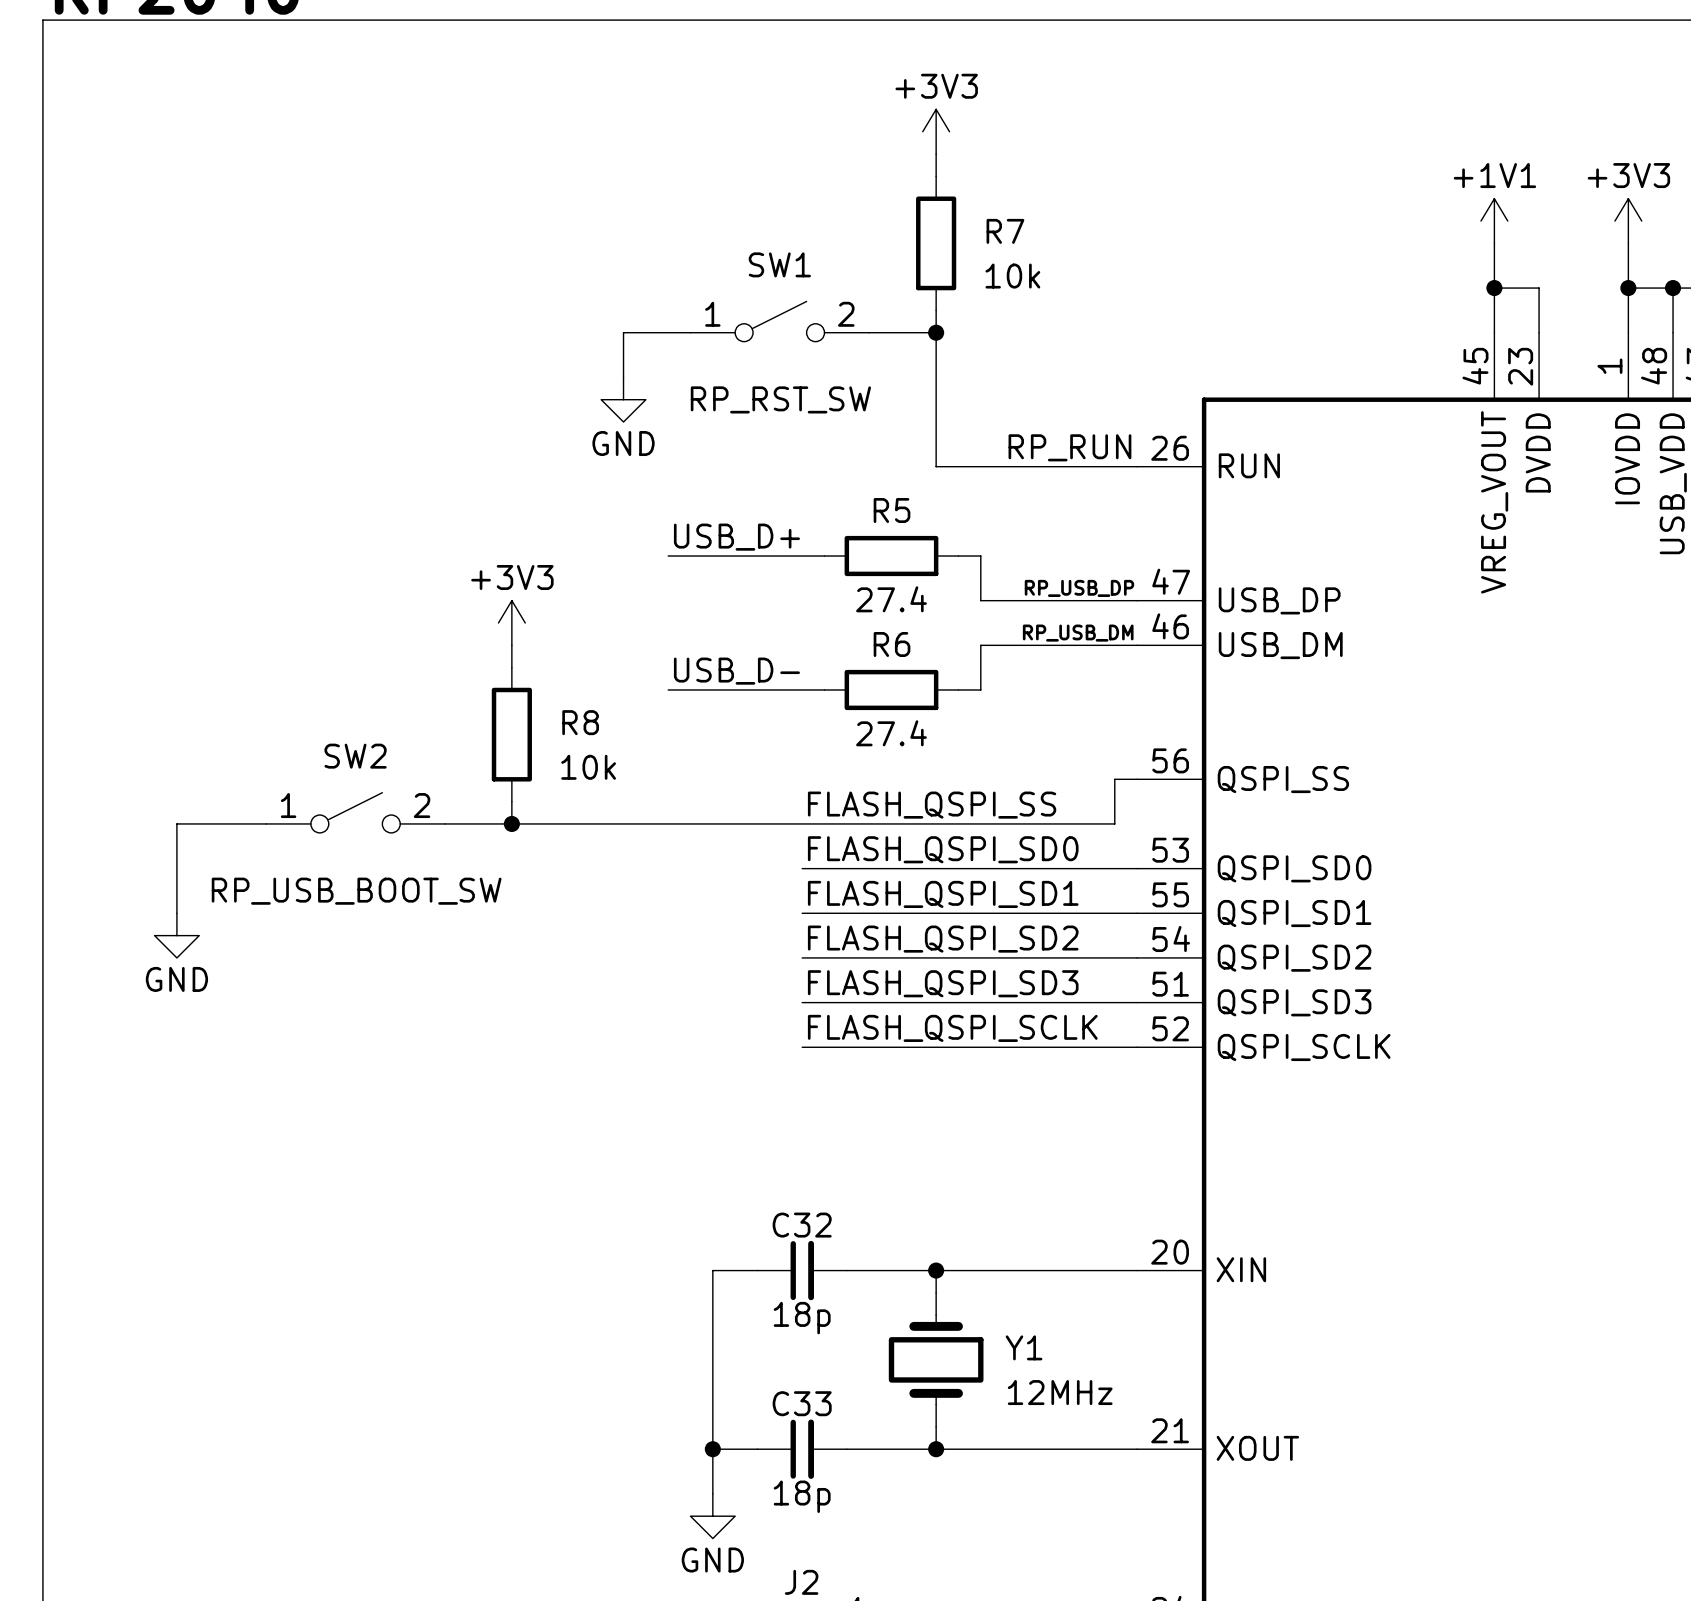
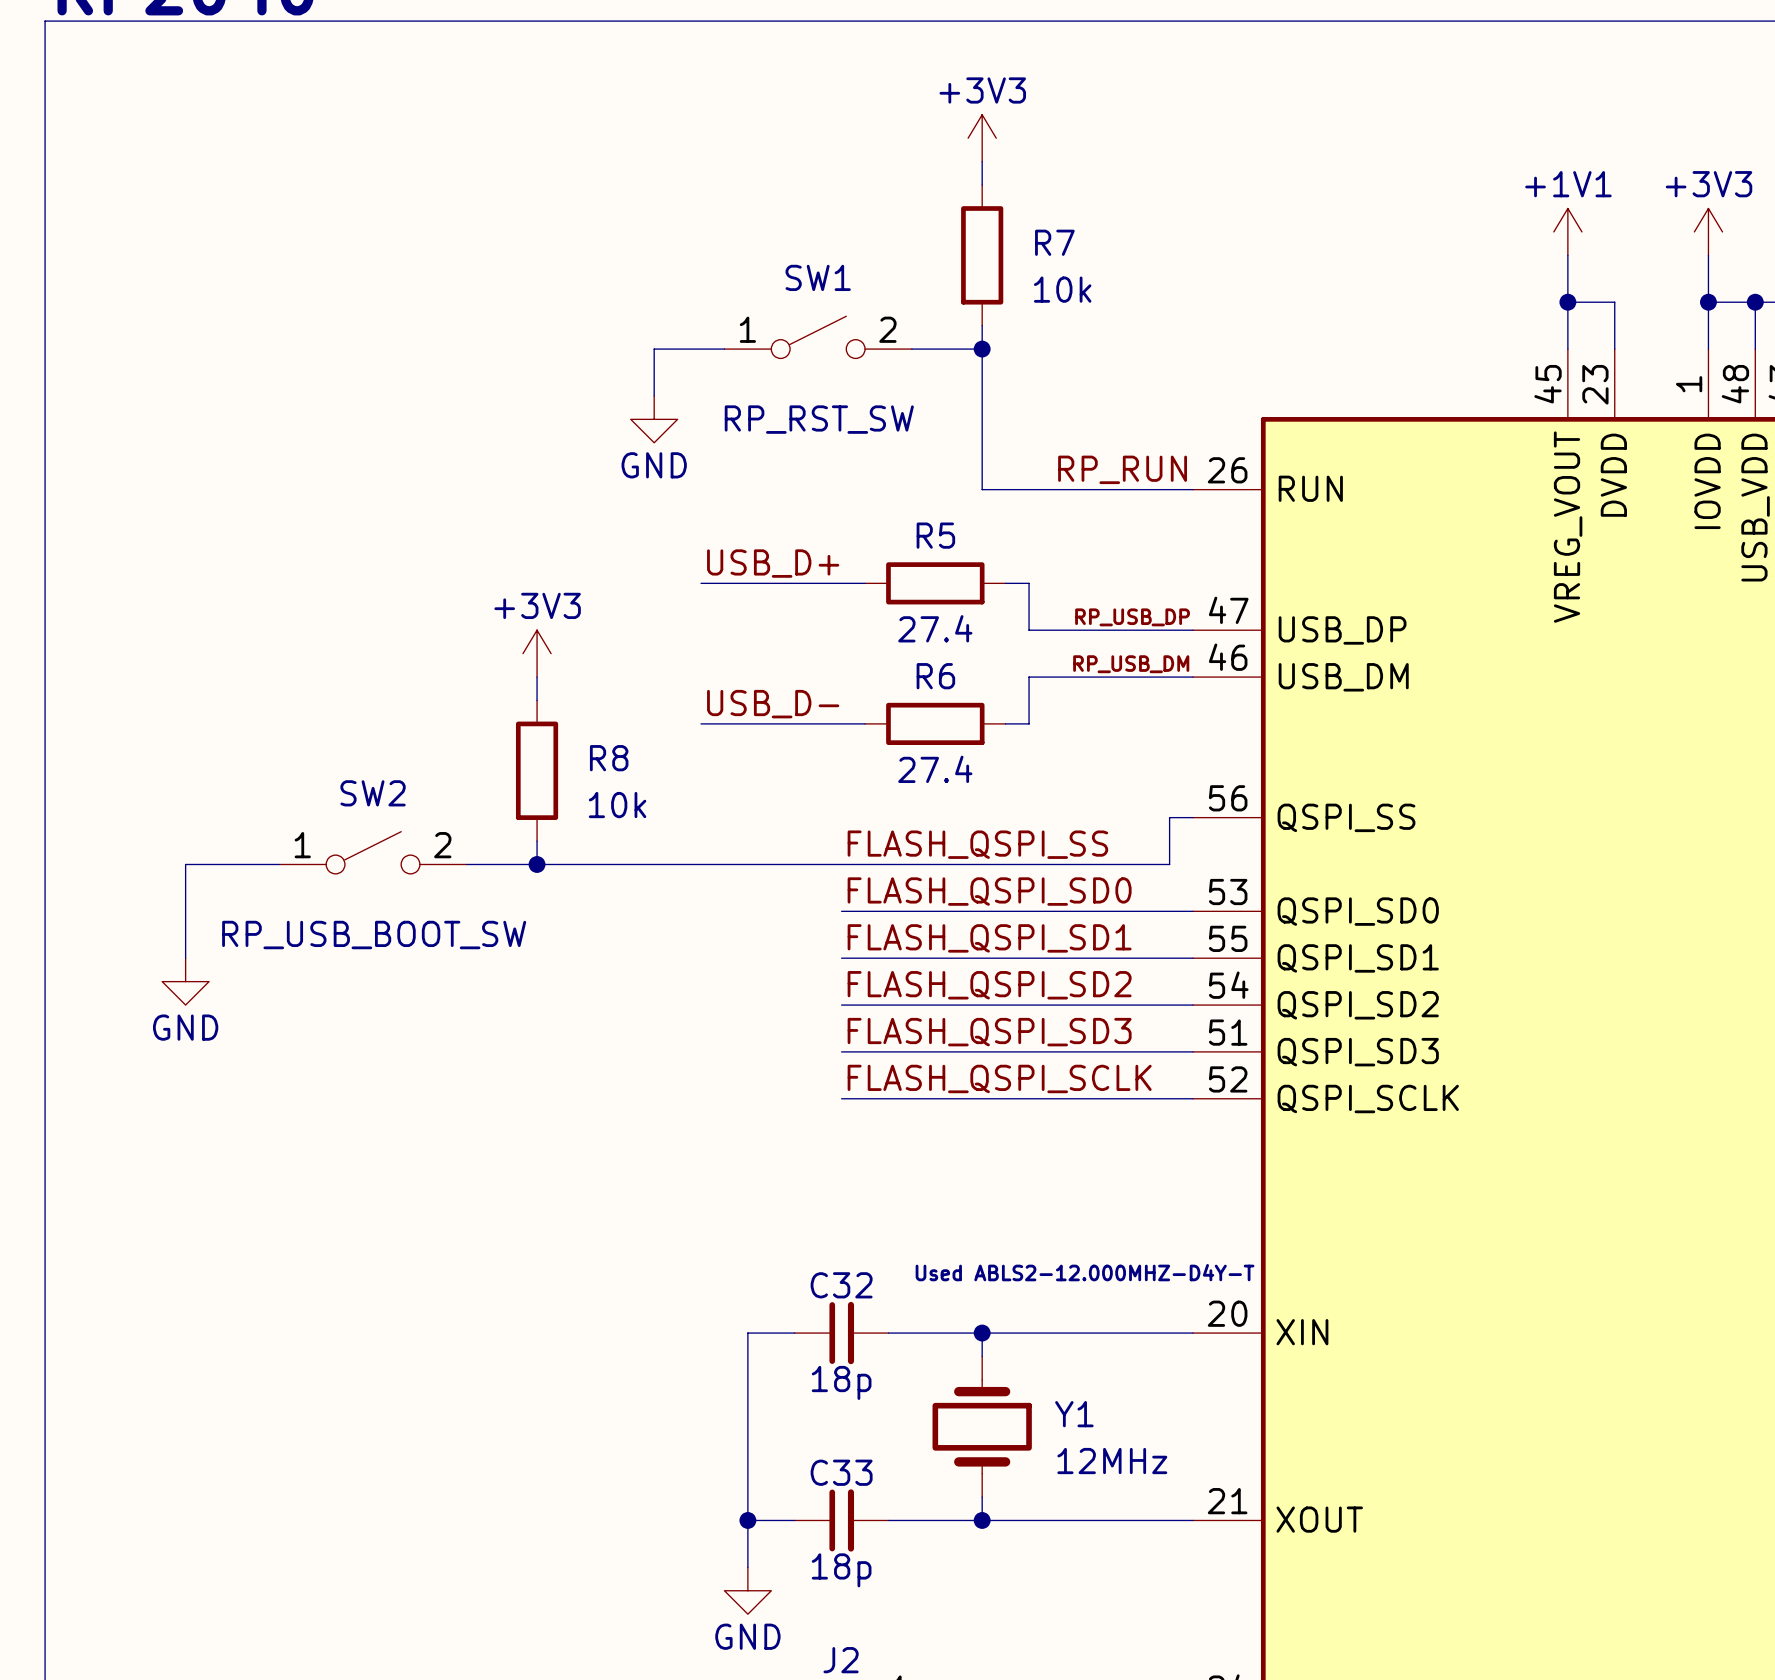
text: none -> Used ABLS2-12.000MHZ-D4Y-T (1085, 1272)

